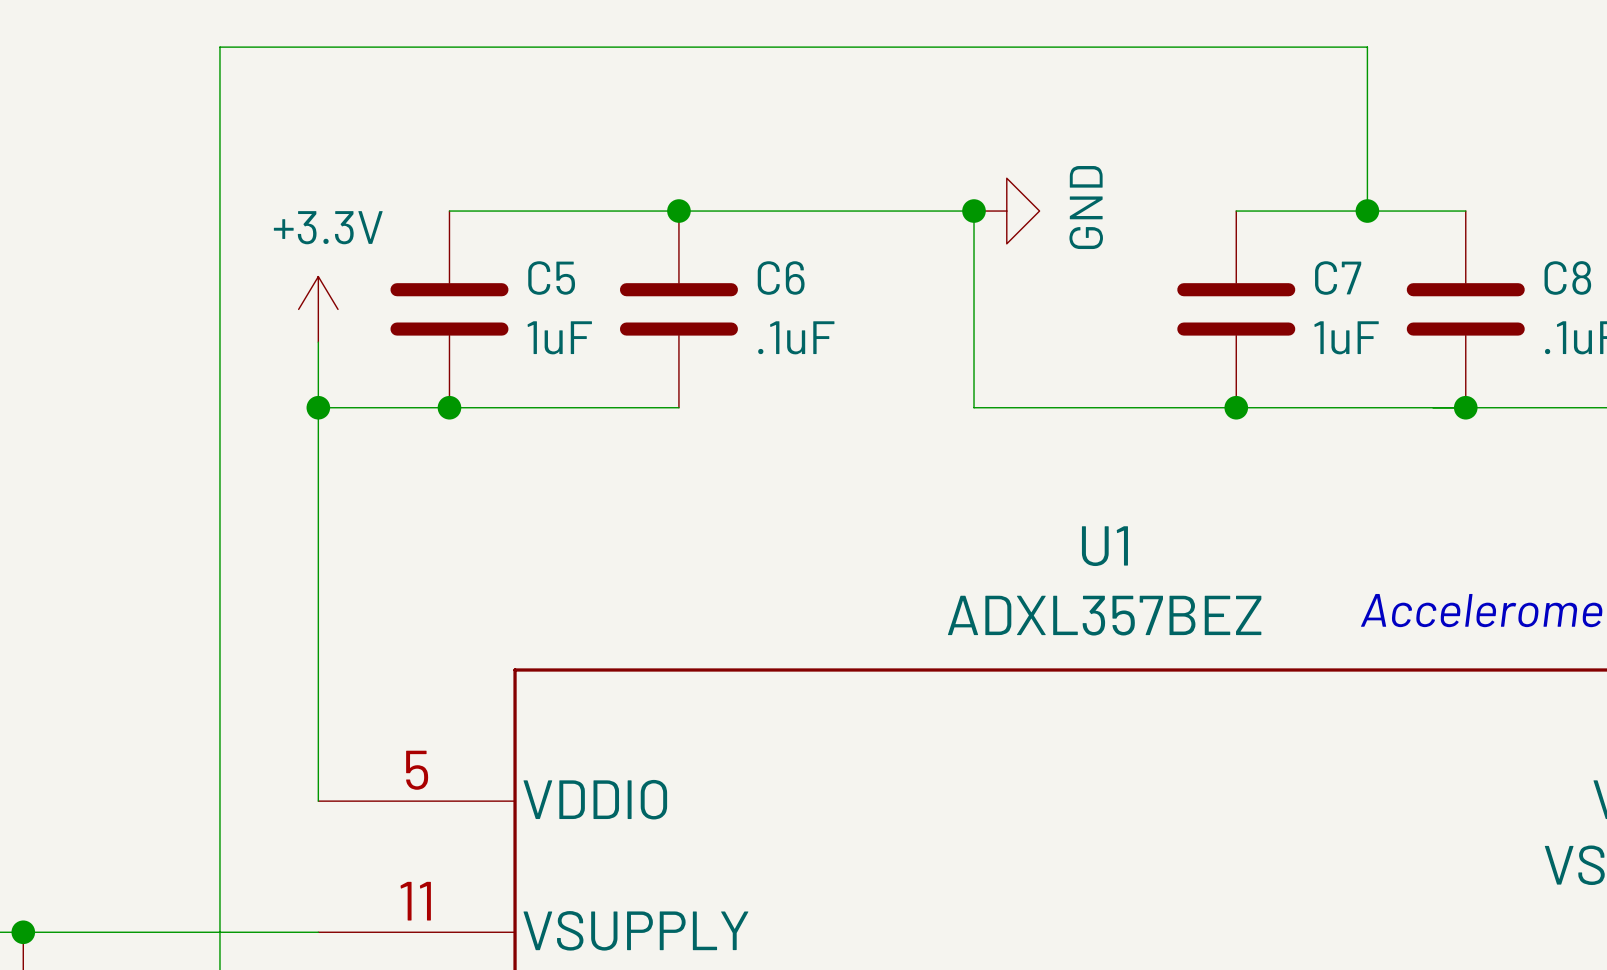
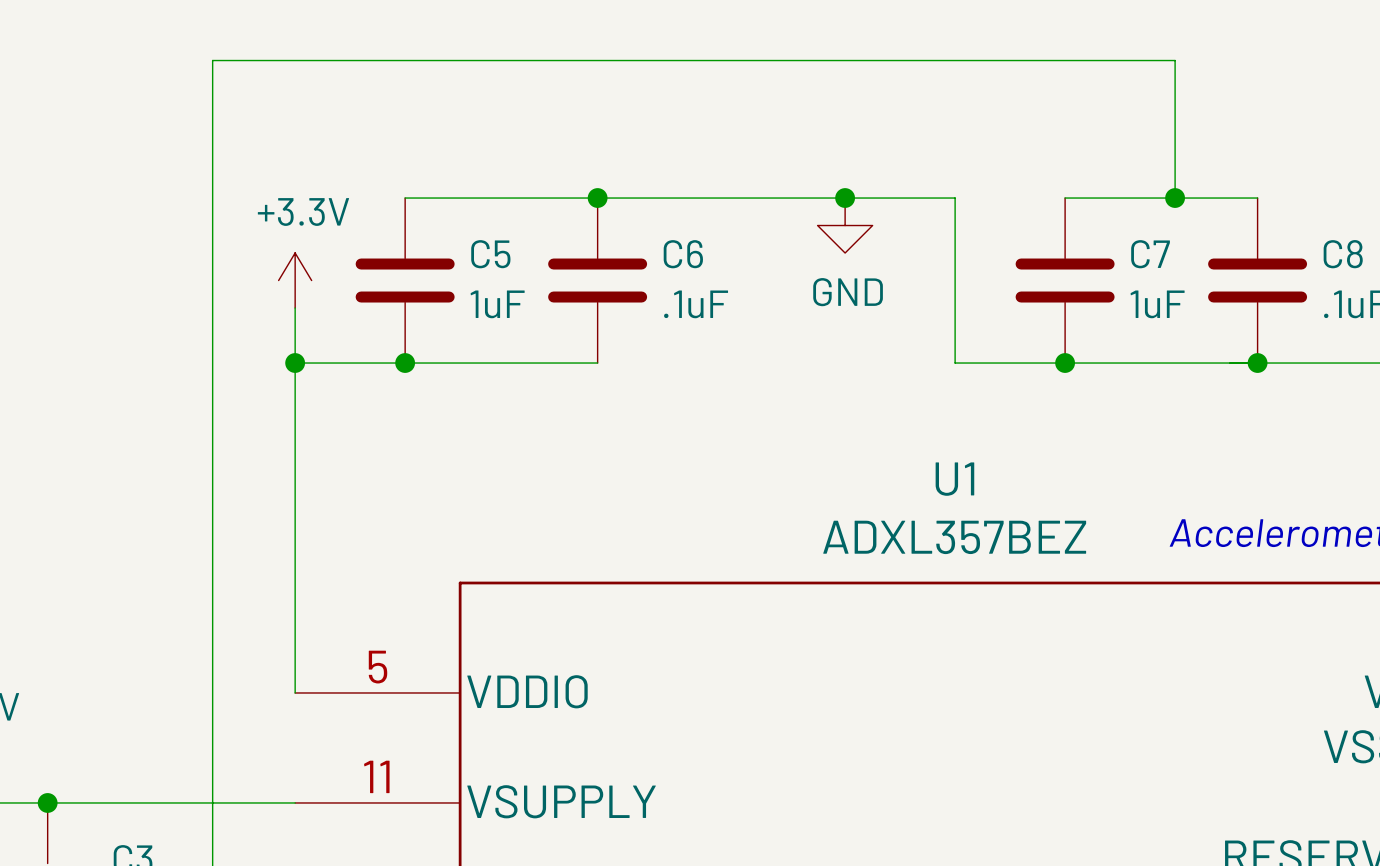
wire: (974, 211) (974, 407) (1105, 407) -> (845, 198) (955, 198) (955, 363)
power symbol rotation: 0° (1006, 211) -> 90° clockwise (845, 225)
power symbol position: GND (1006, 211) -> GND (845, 225)

